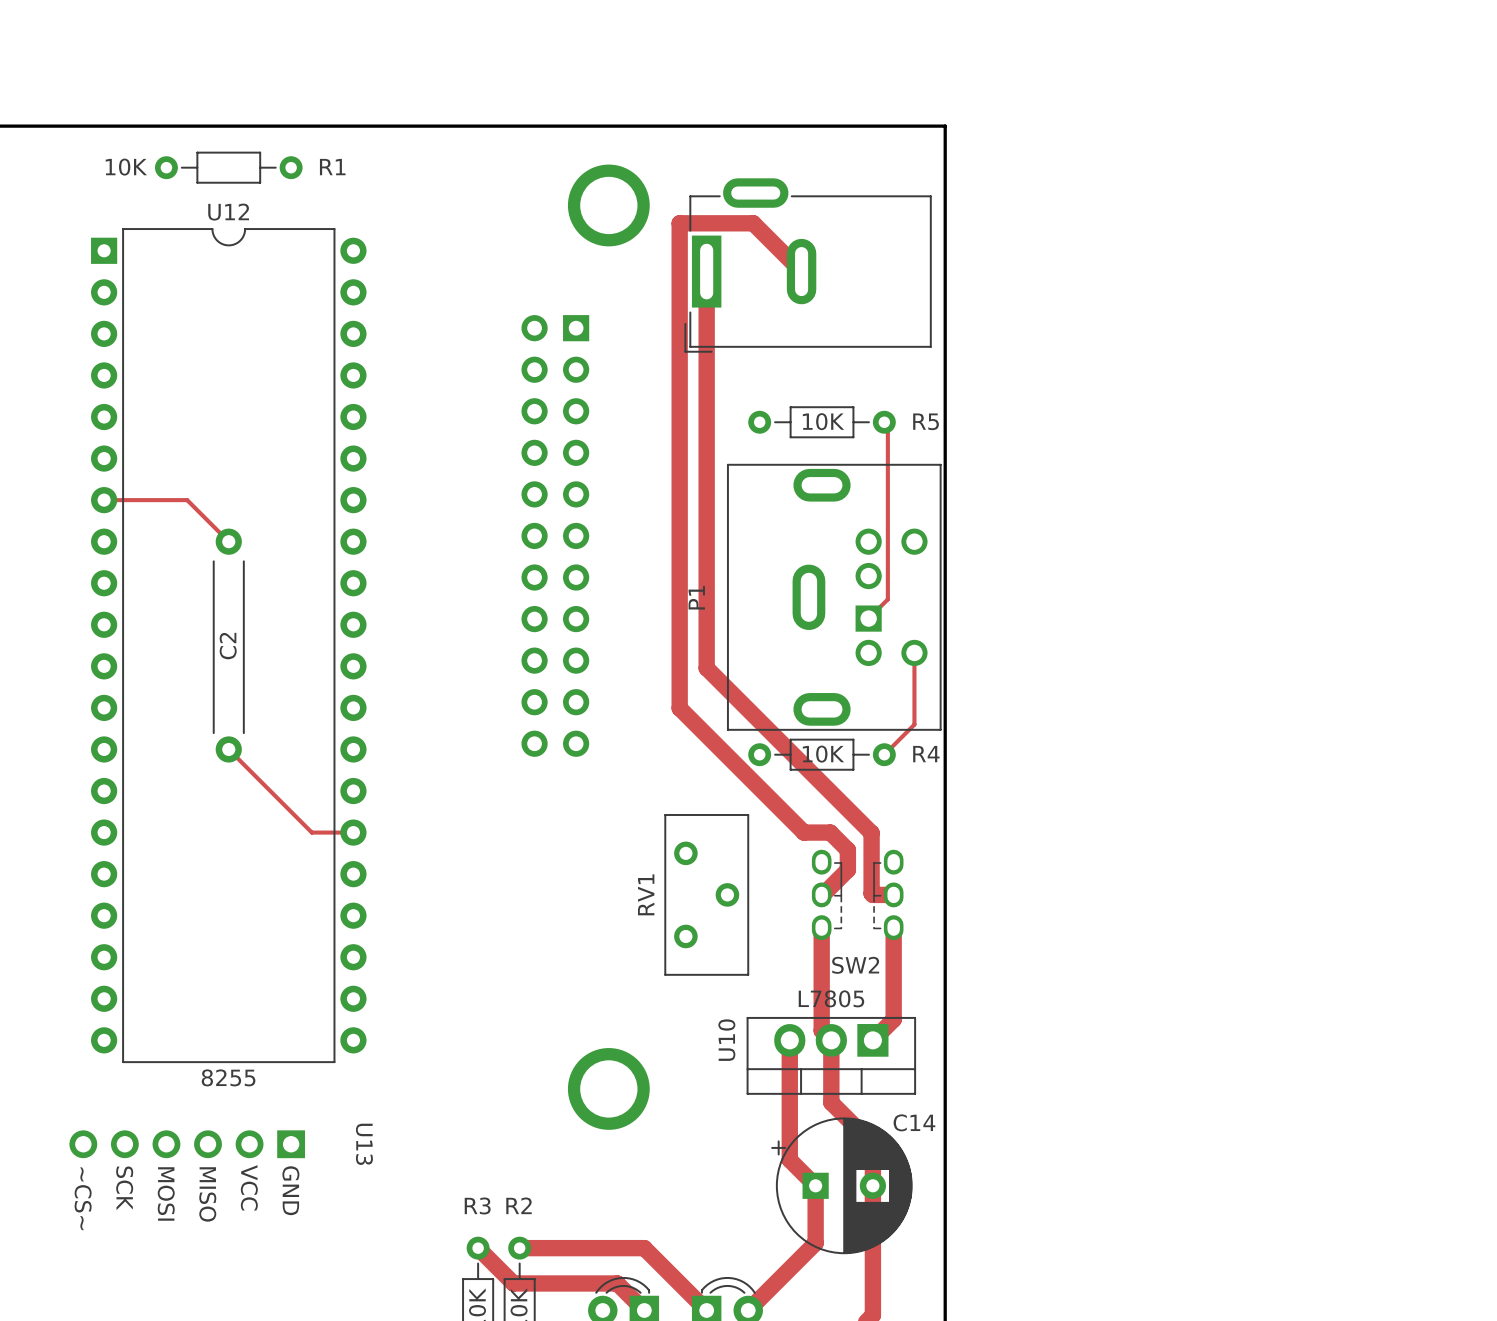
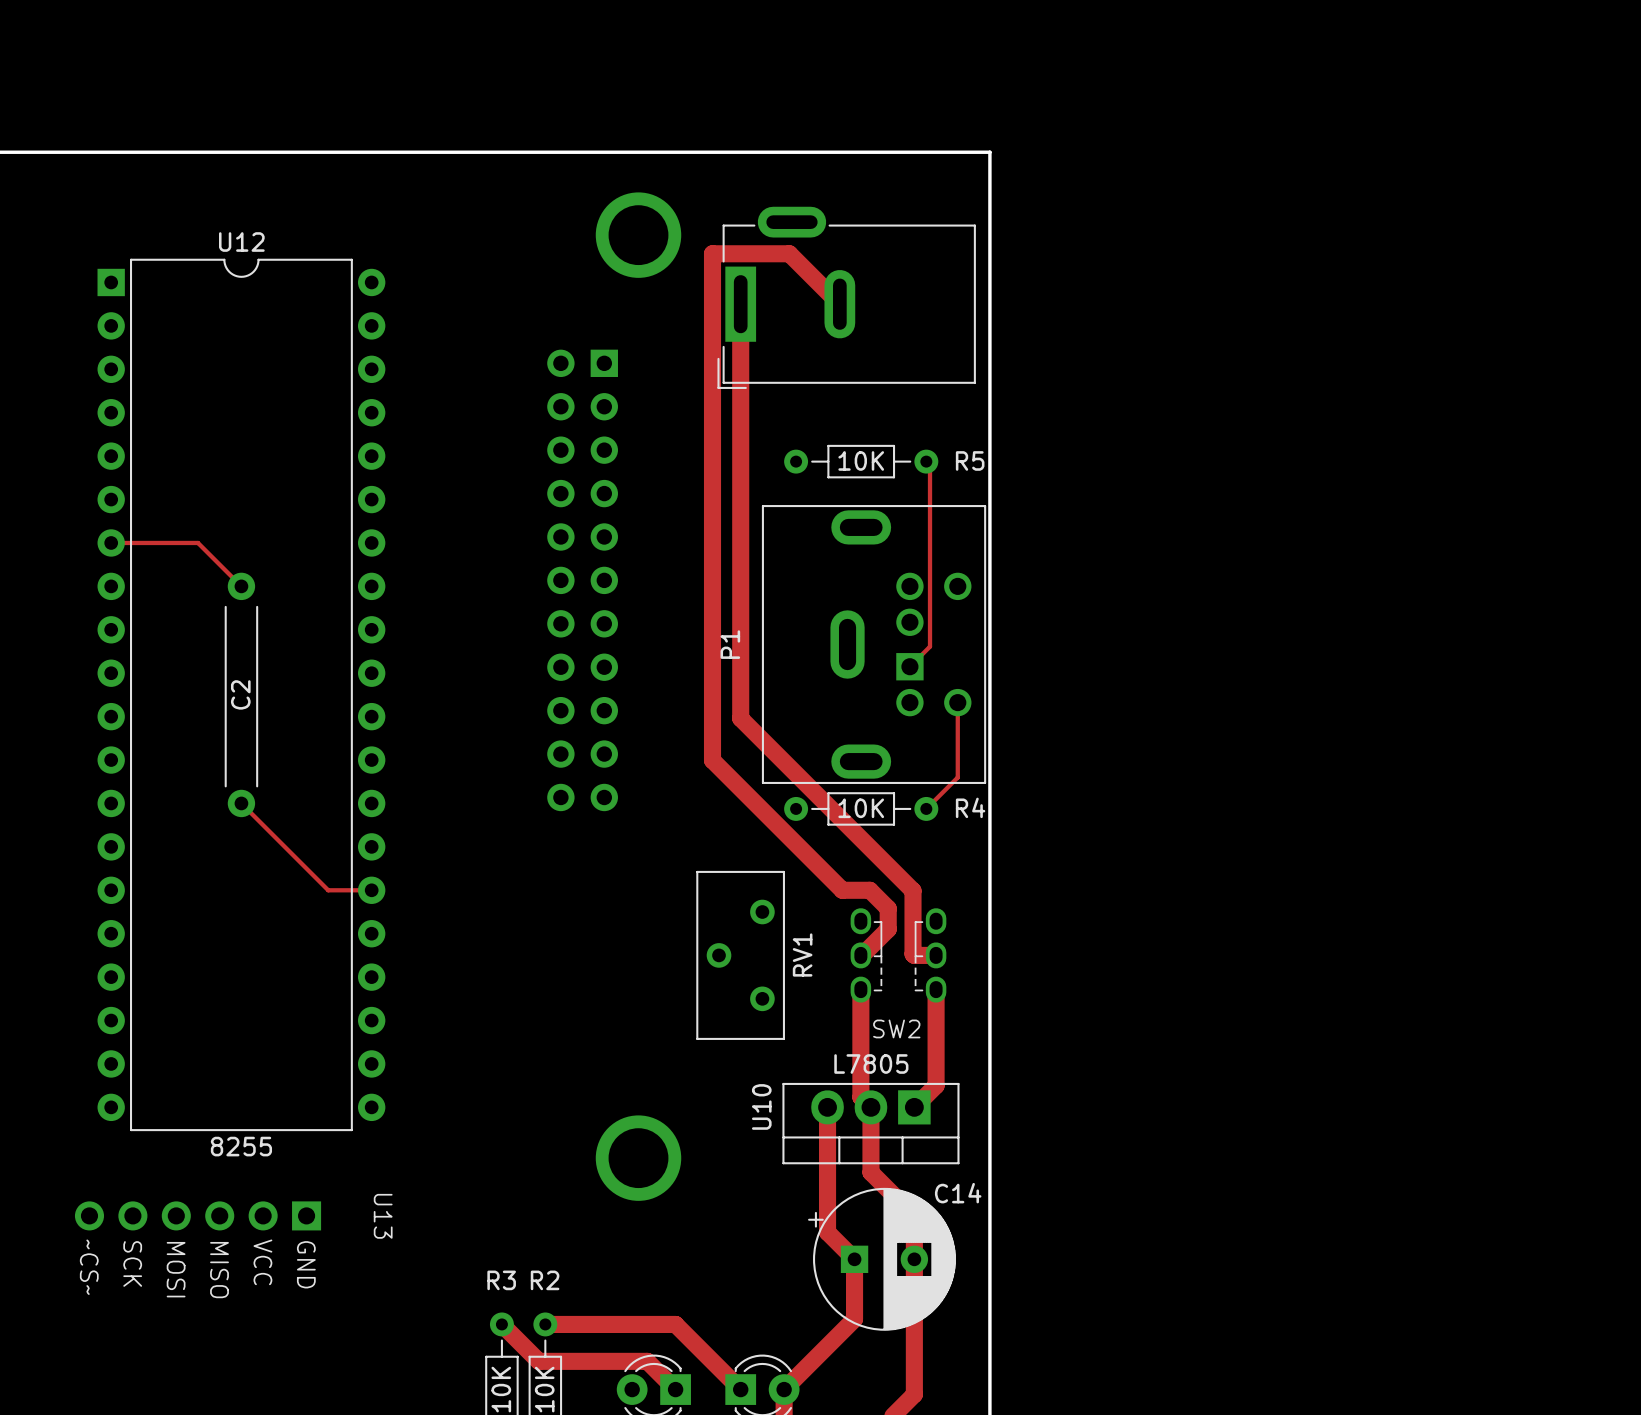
R1: 10K (228, 167) -> none
RV1 rotation: 0° (706, 894) -> 180° (740, 955)

